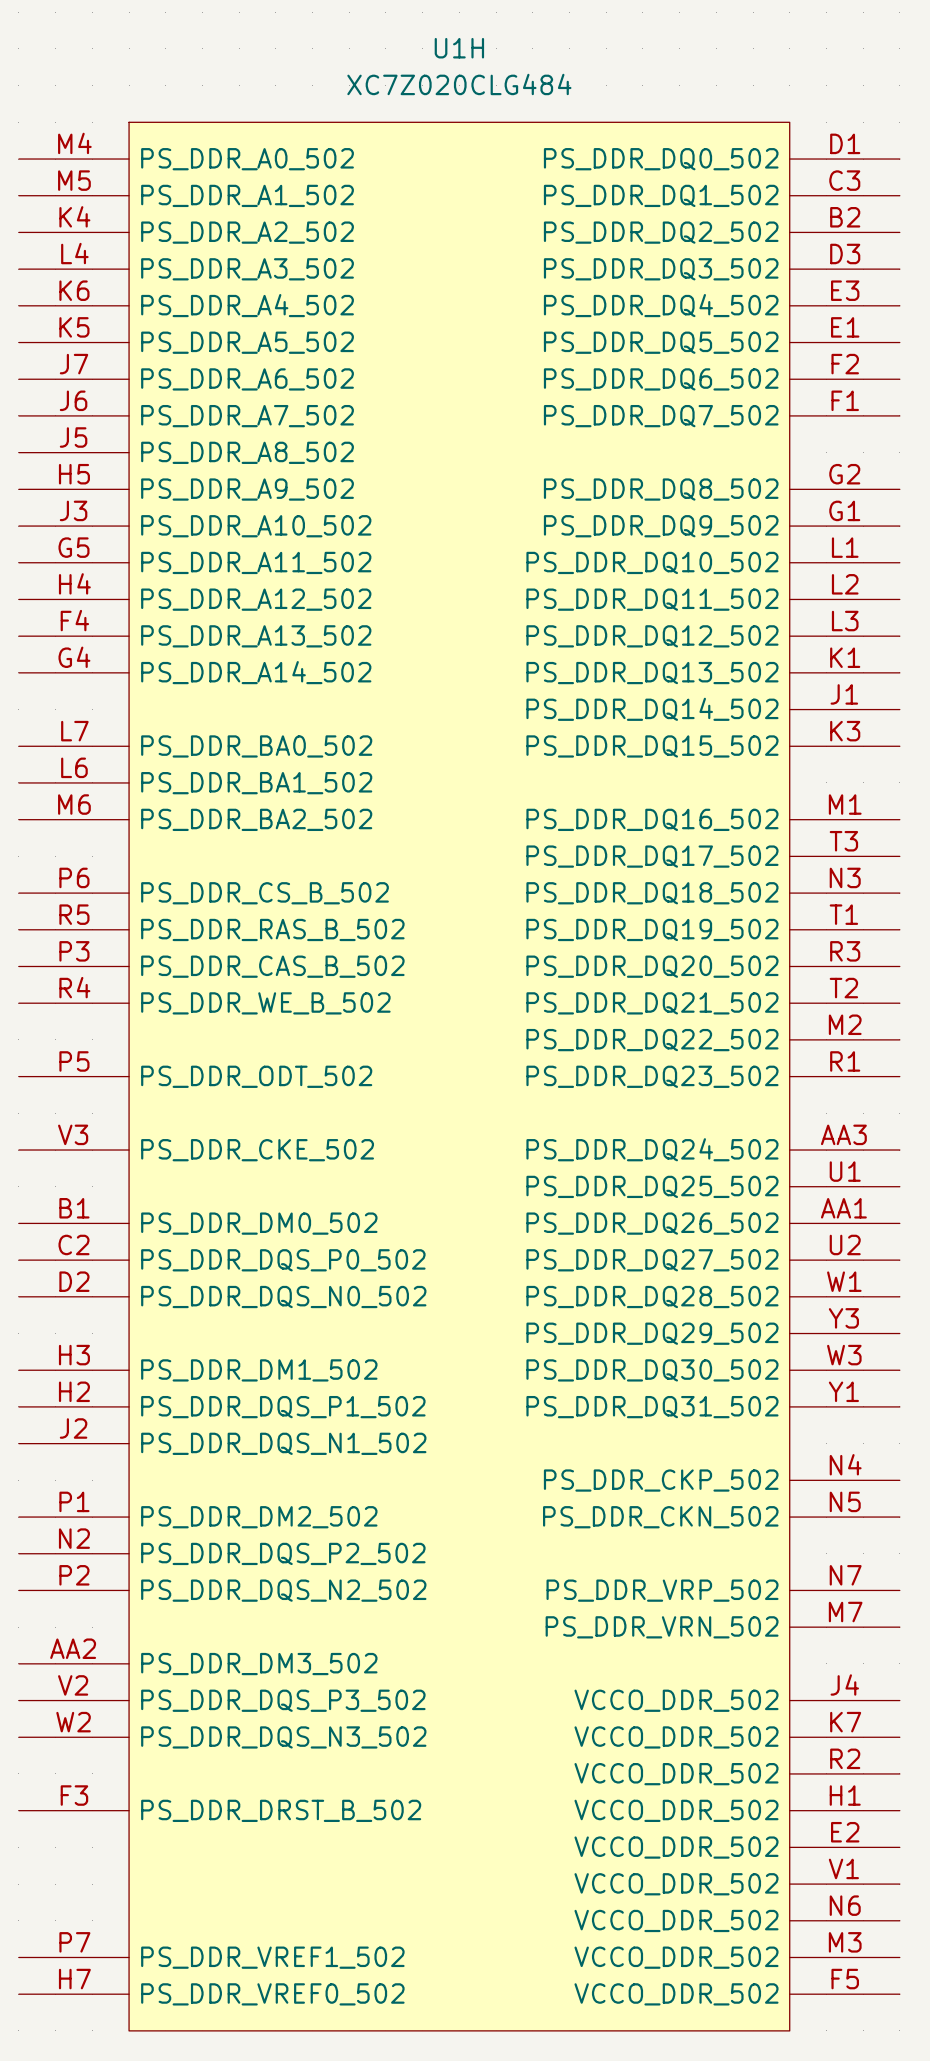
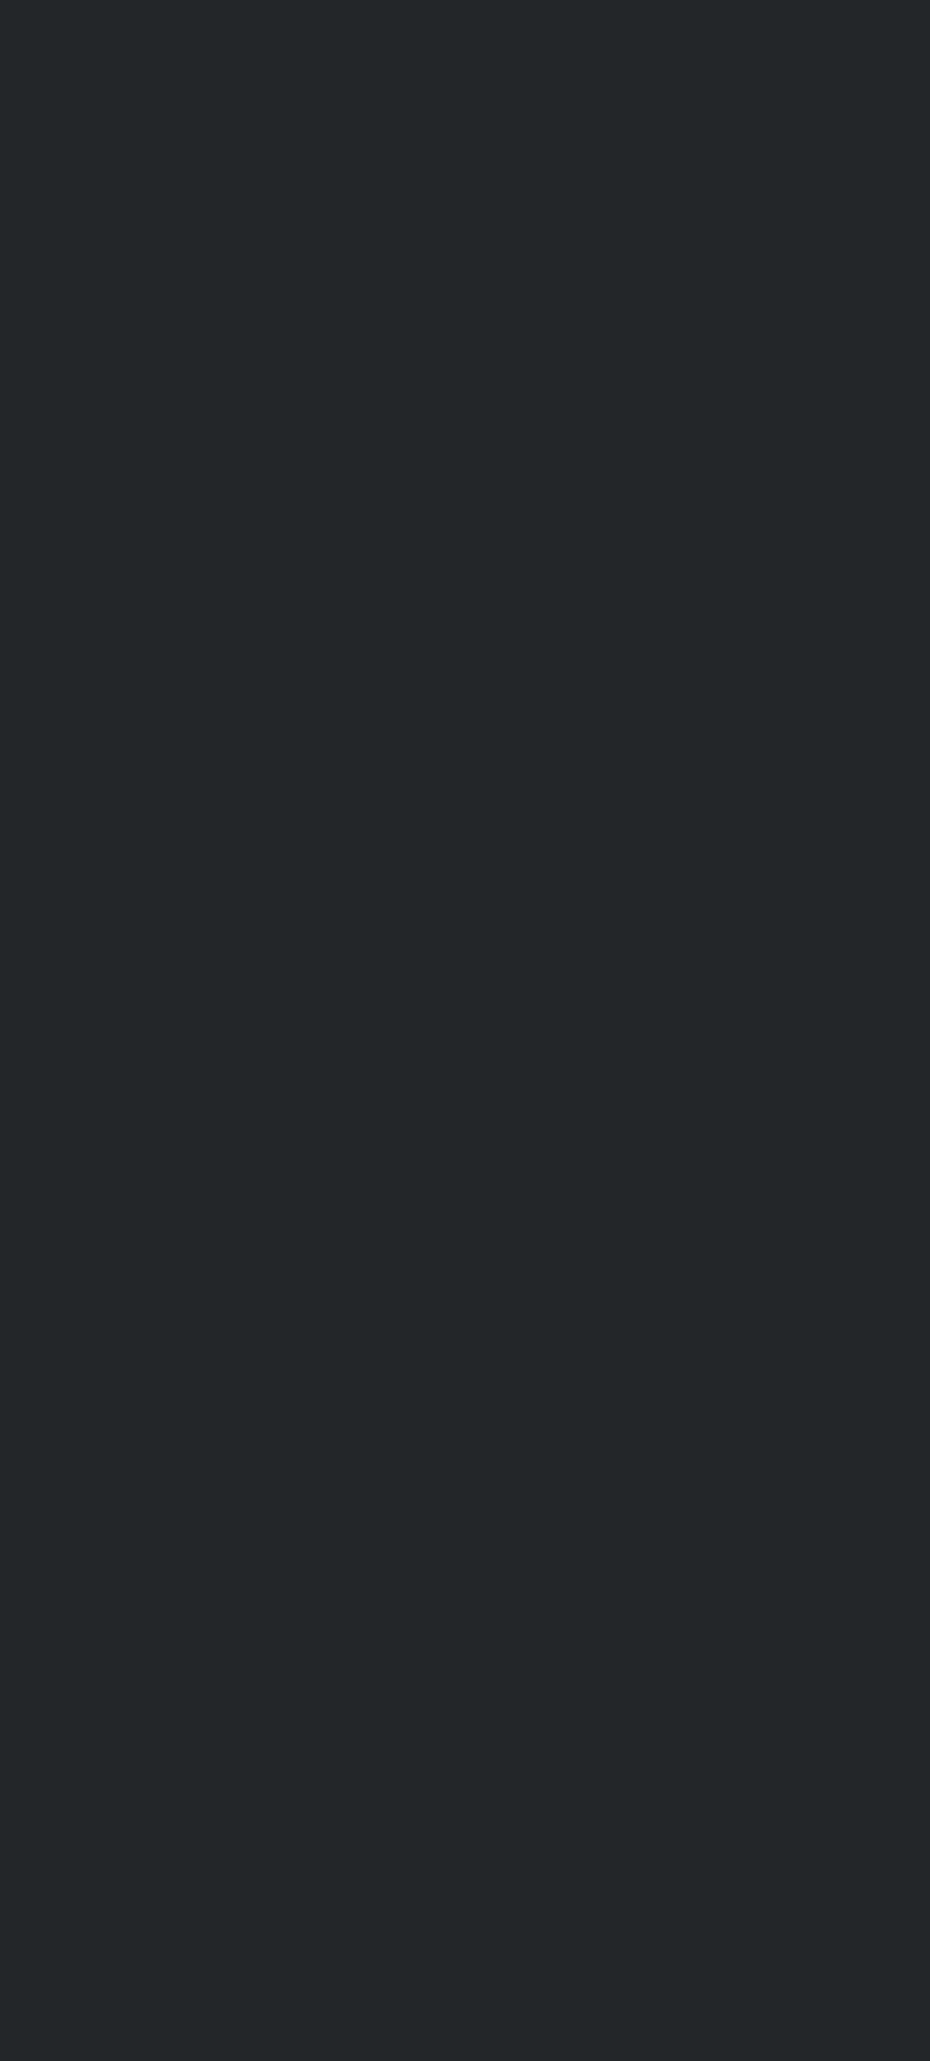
U1H: XC7Z020CLG484 (459, 1076) -> none

